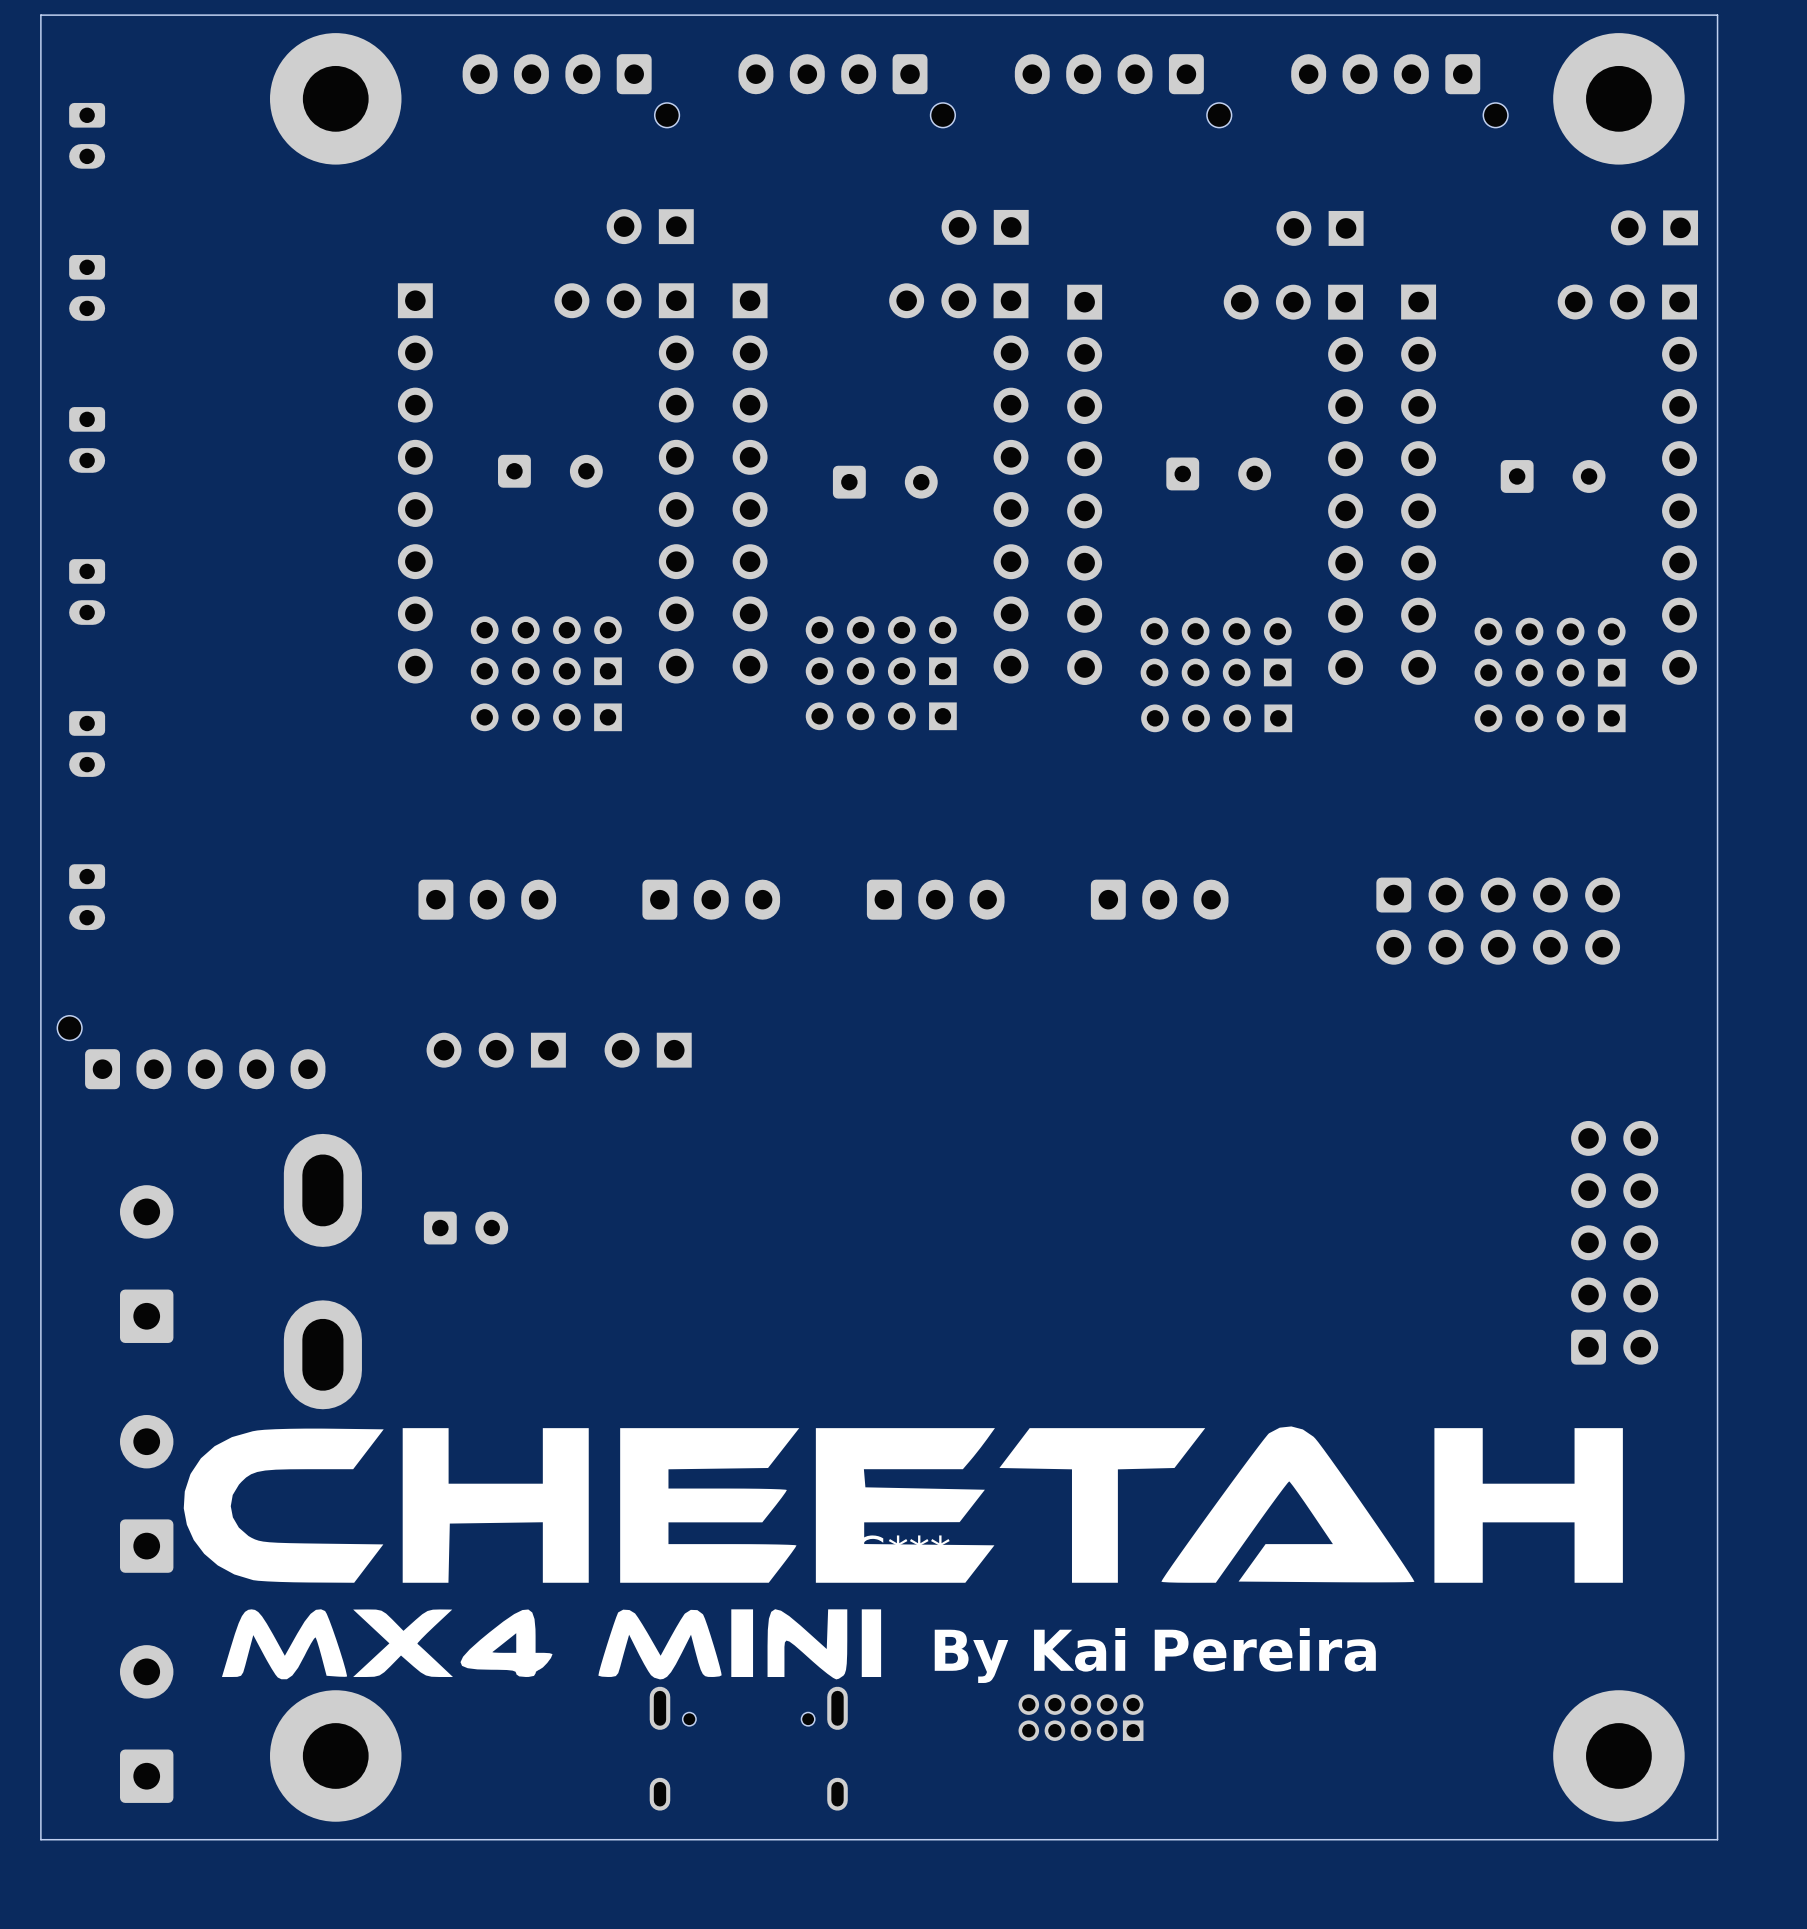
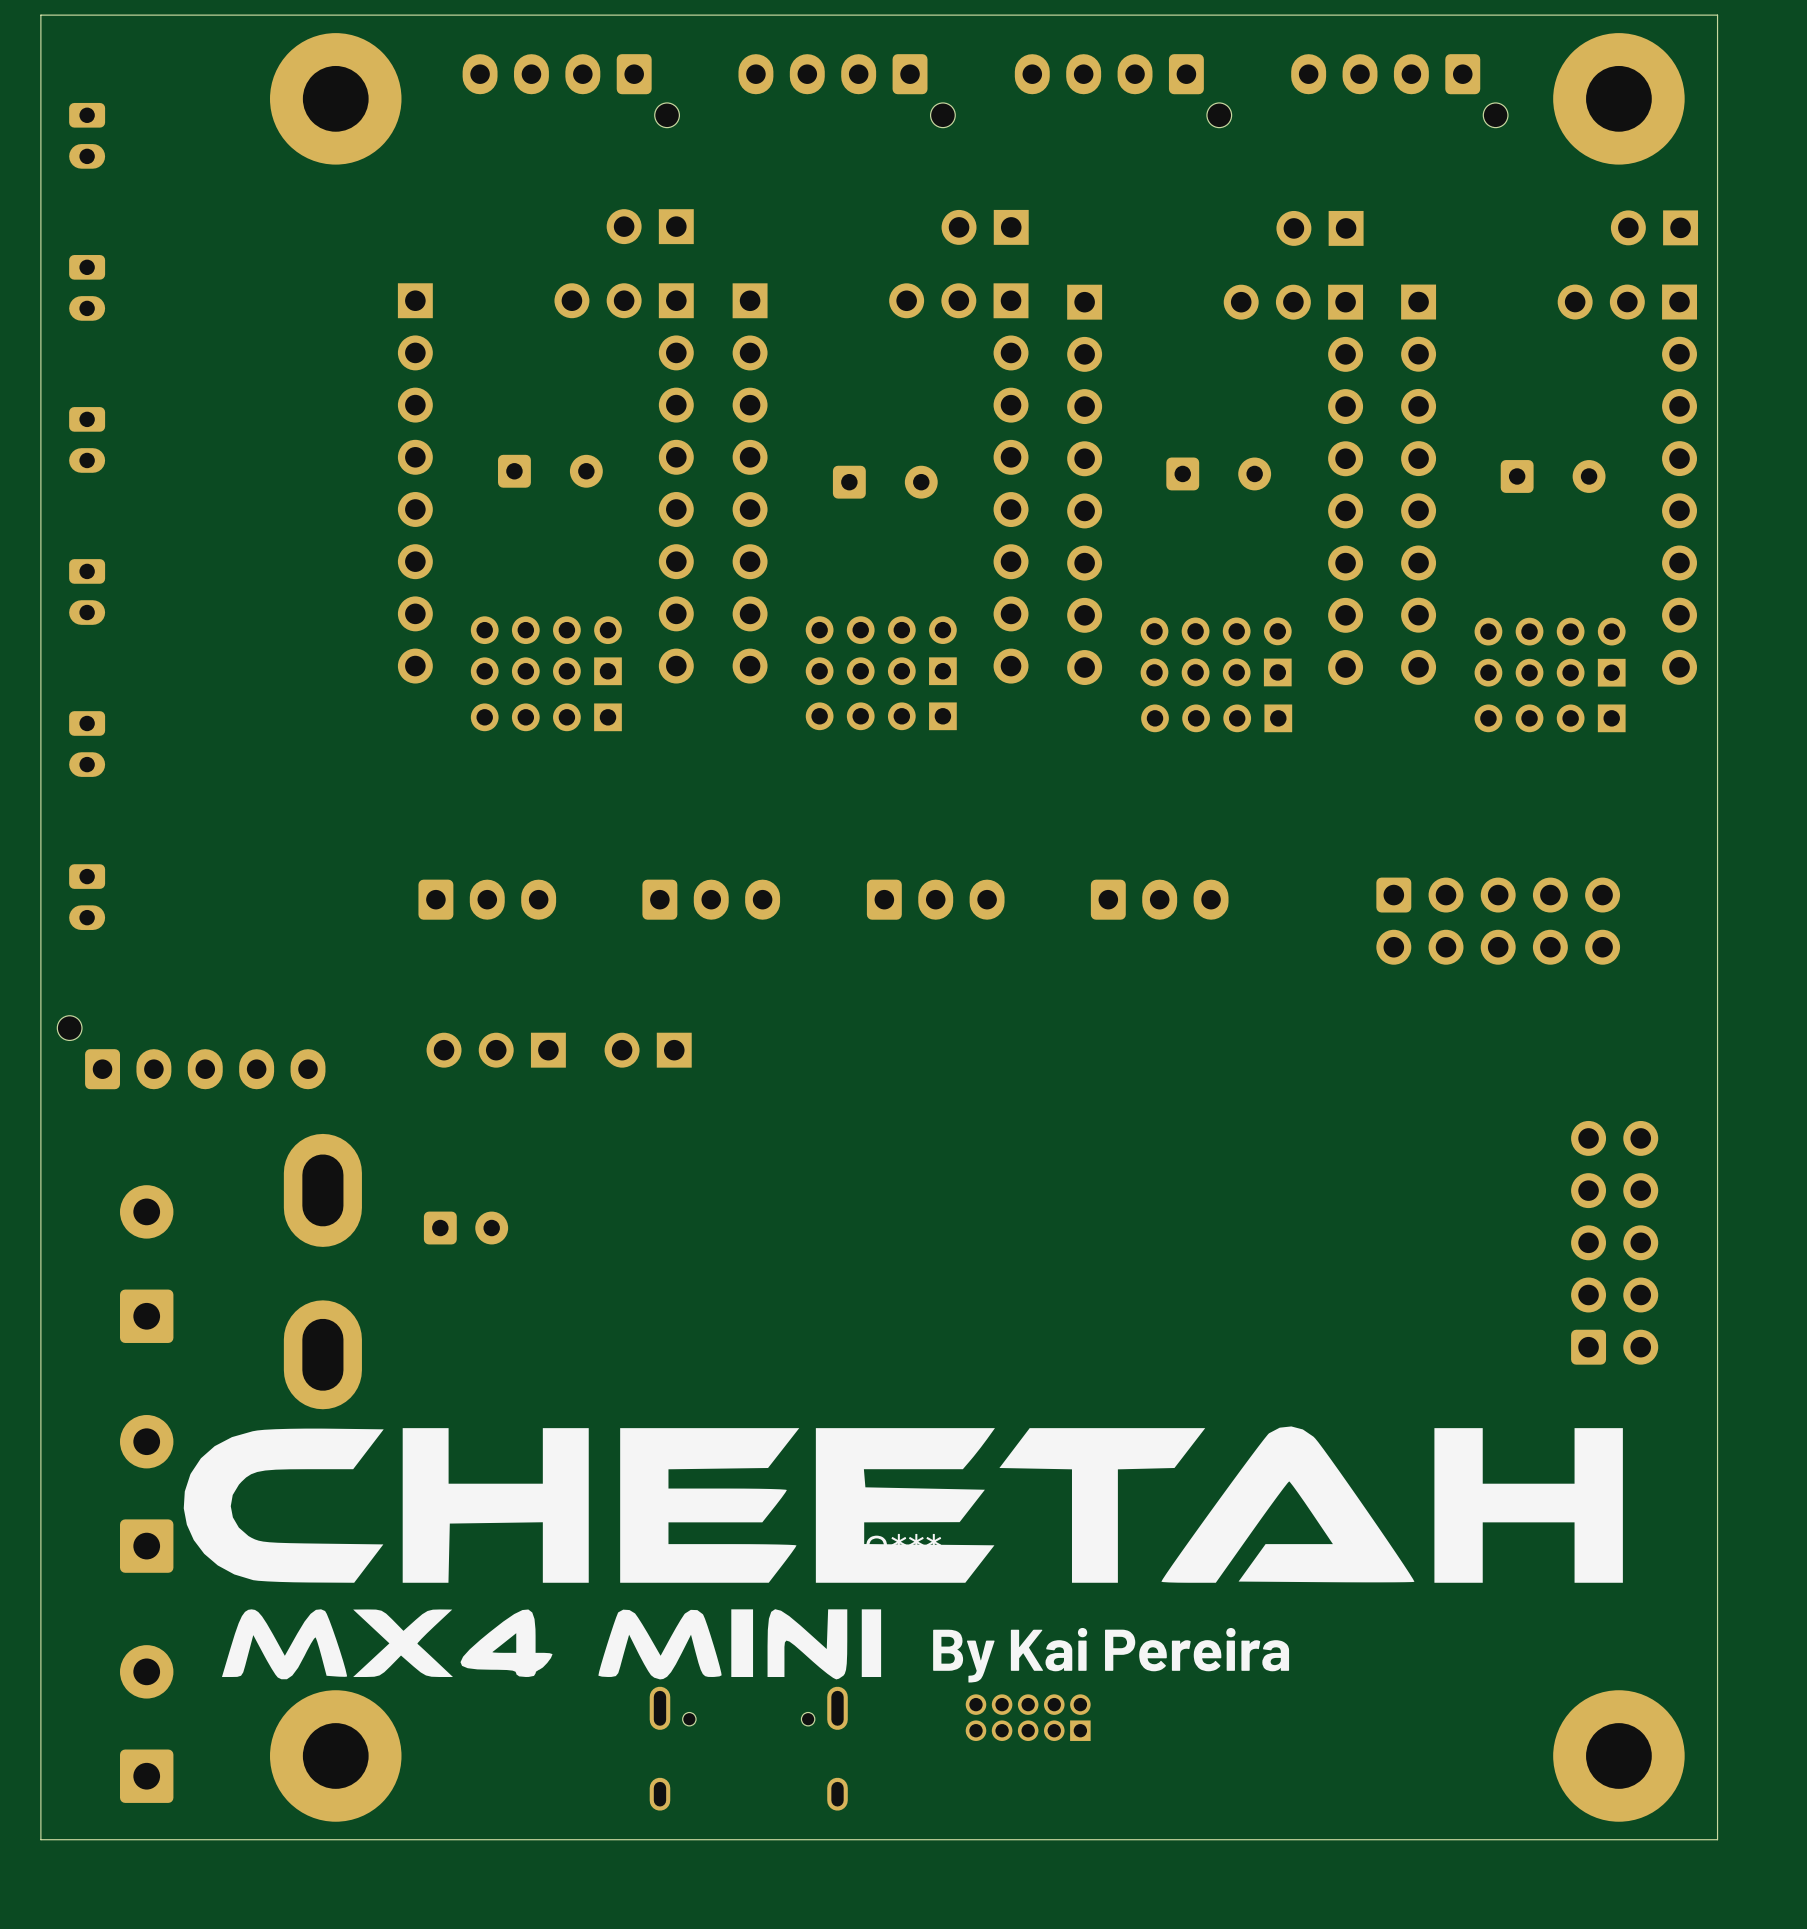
part position: (1080, 1717) -> (1028, 1717)

